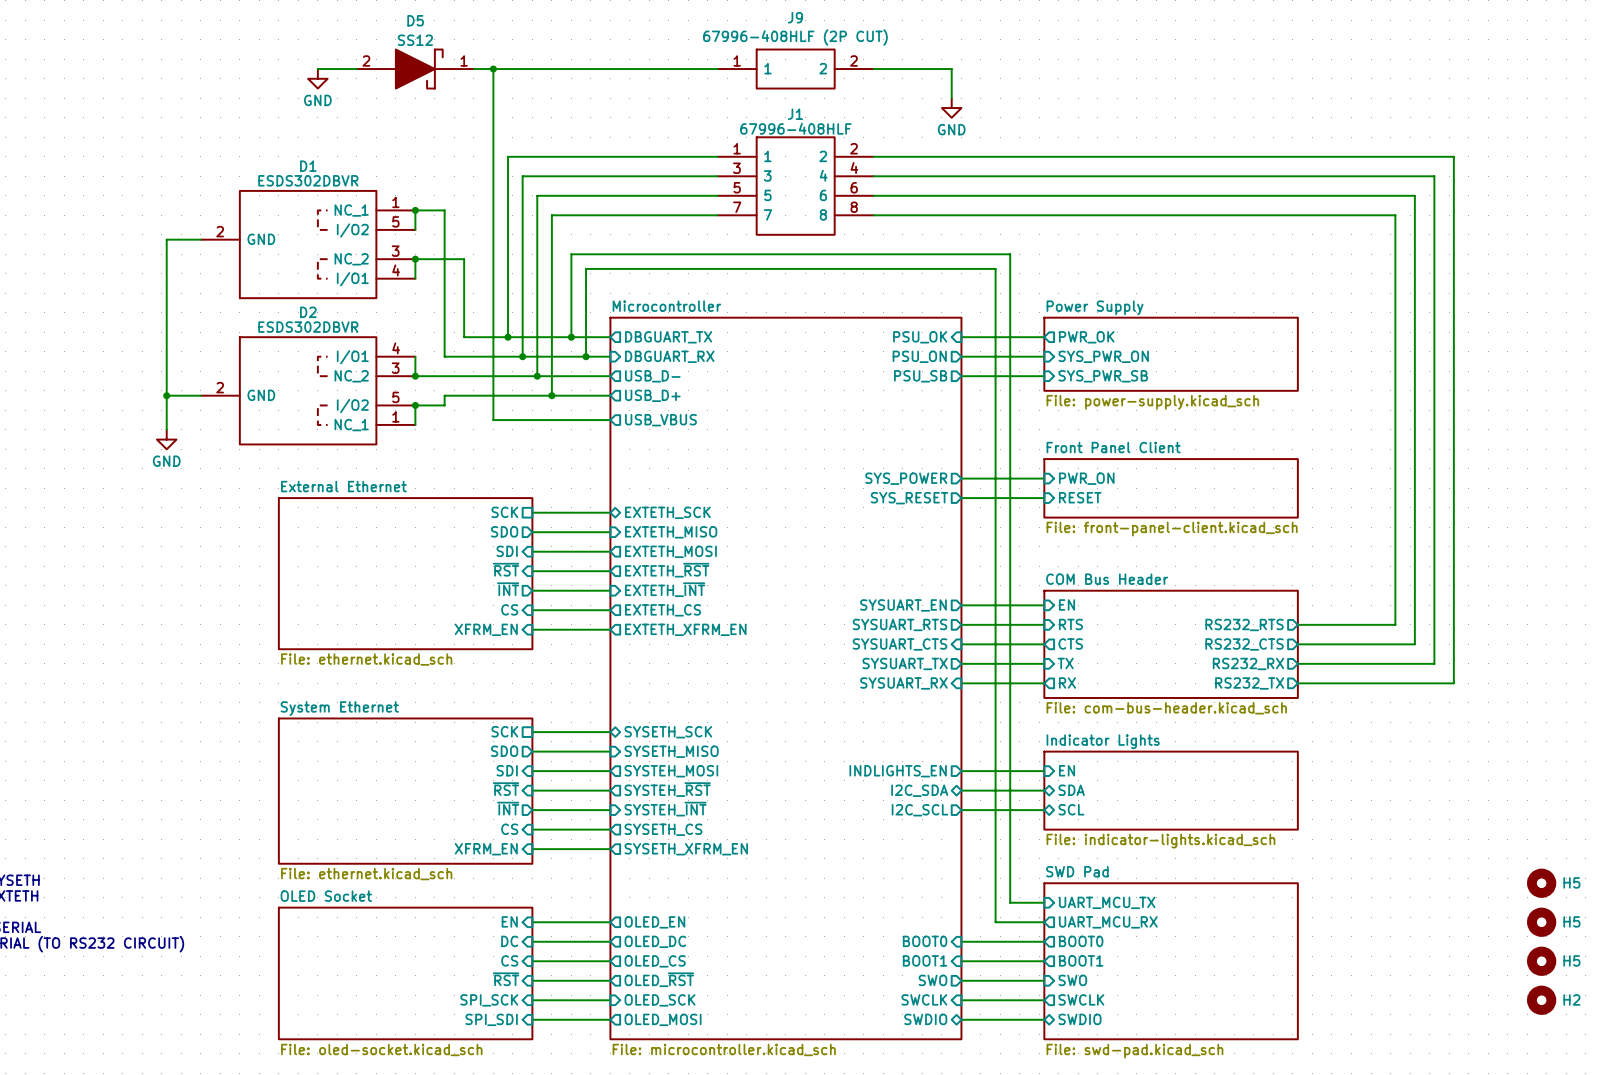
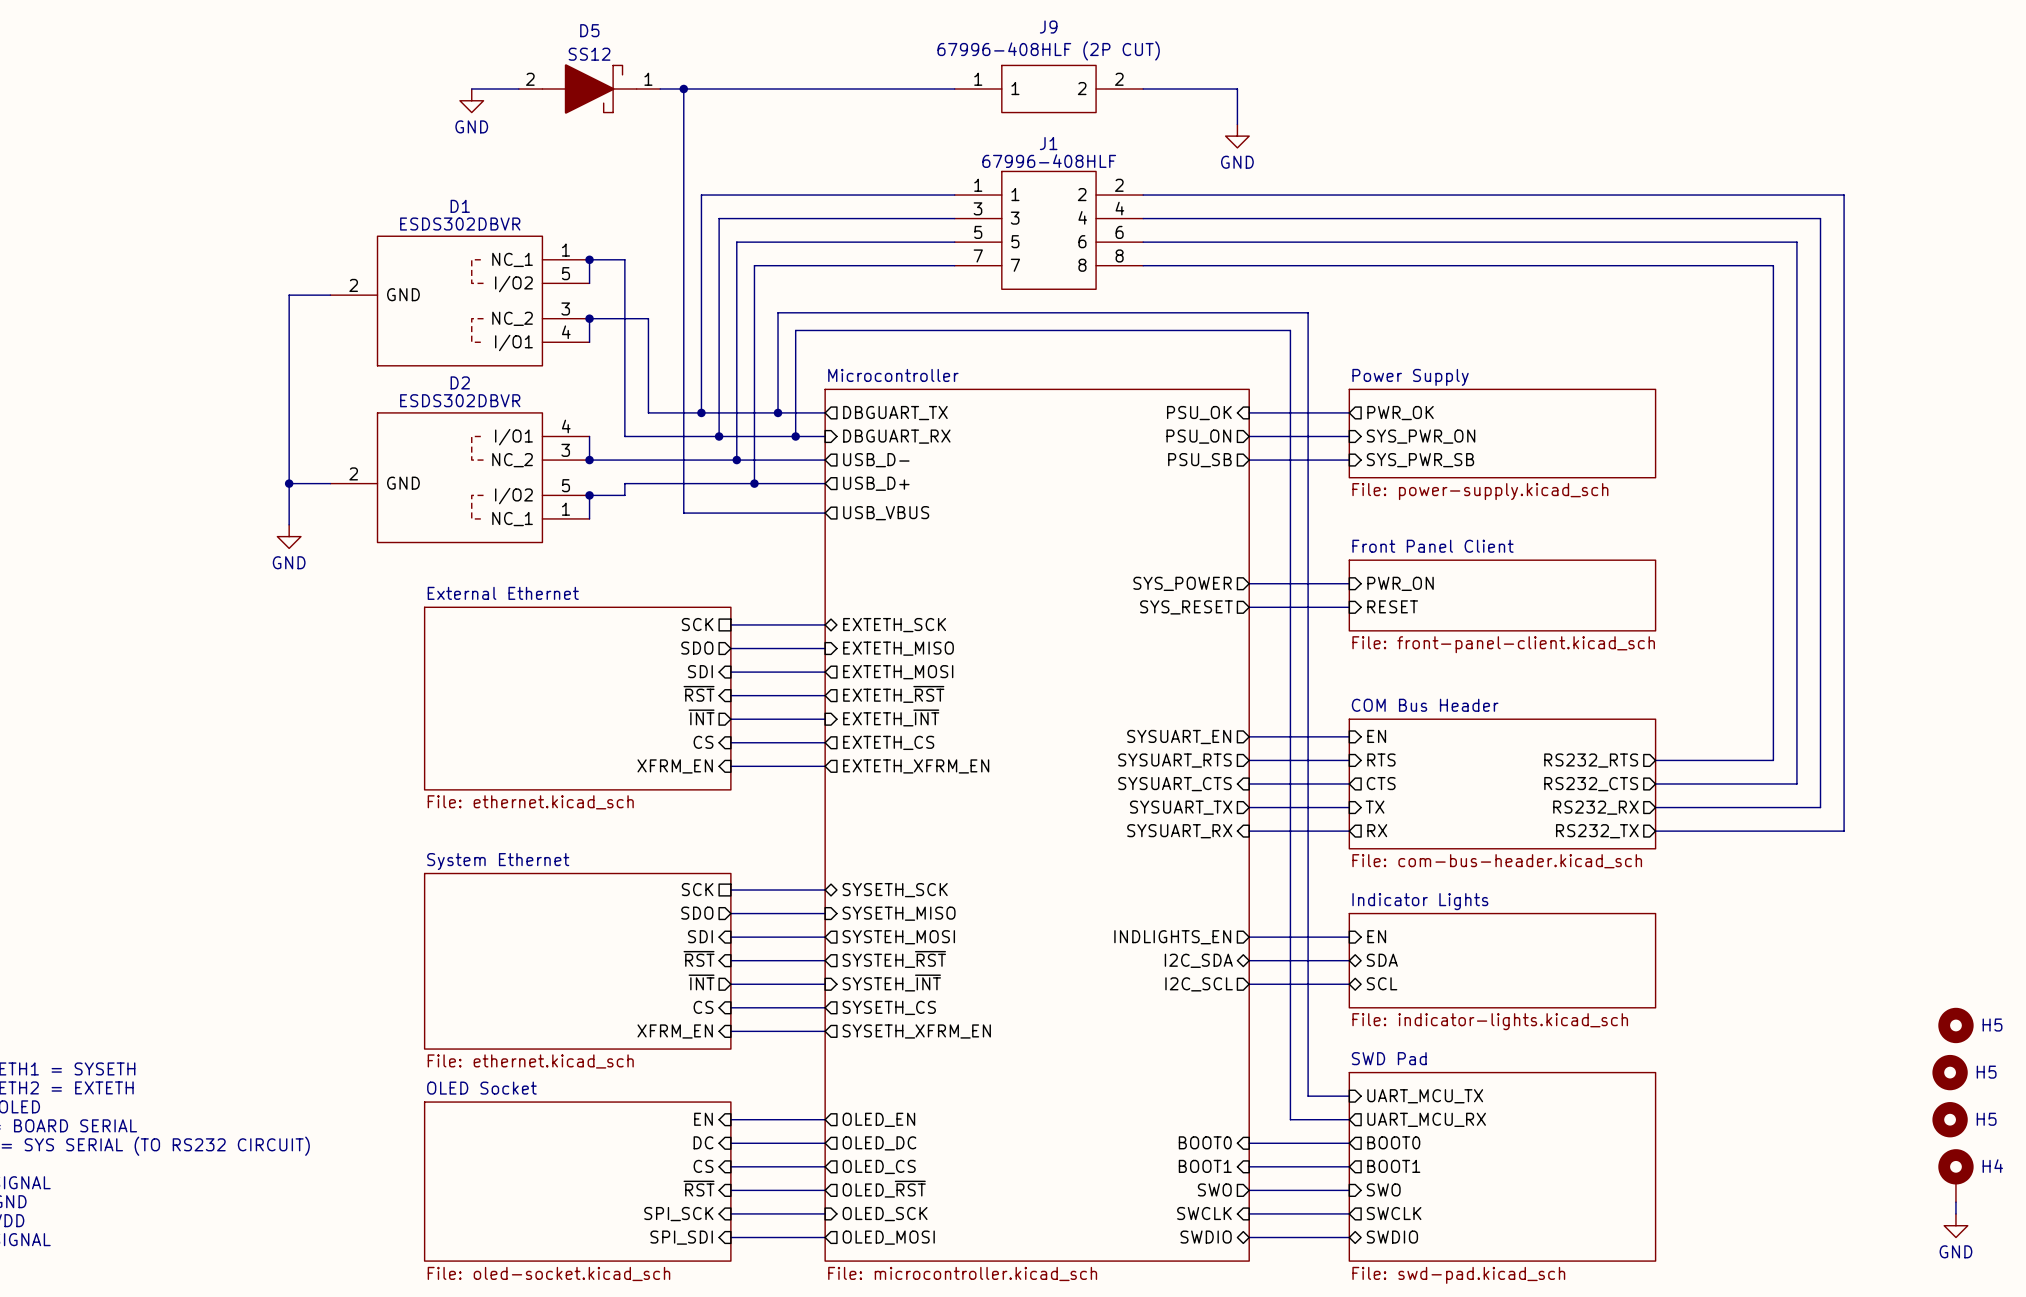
H5 position: (1541, 961) -> (1955, 1025)
H4: none -> (1955, 1175)
H2: (1541, 1000) -> none
power symbol: none -> GND (1955, 1225)

